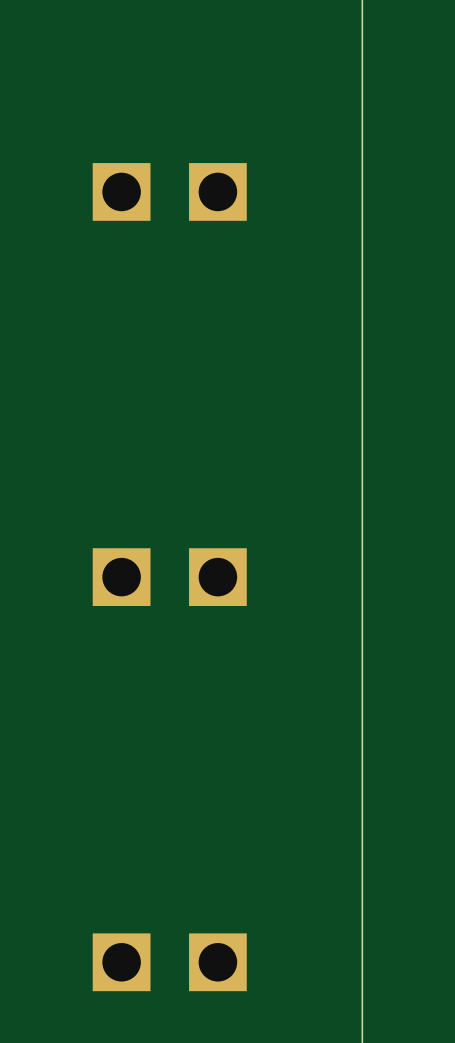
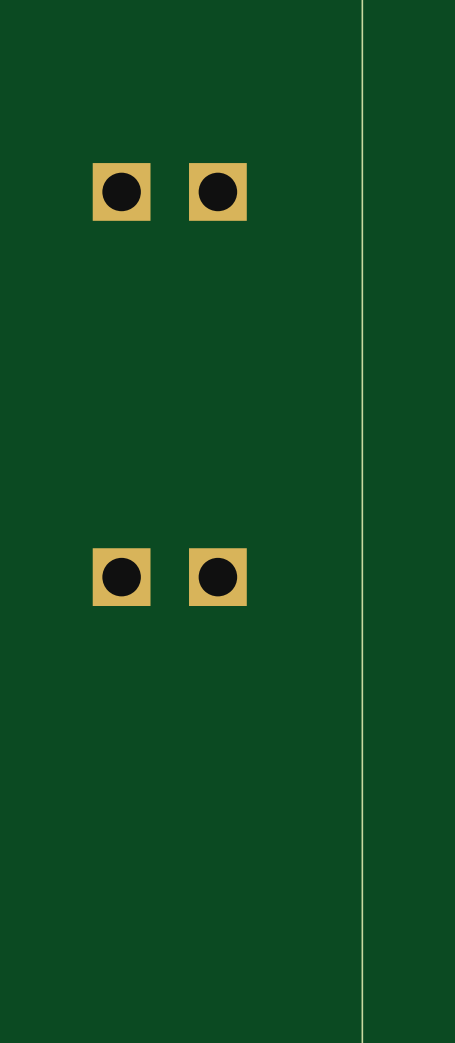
part: (169, 962) -> none

